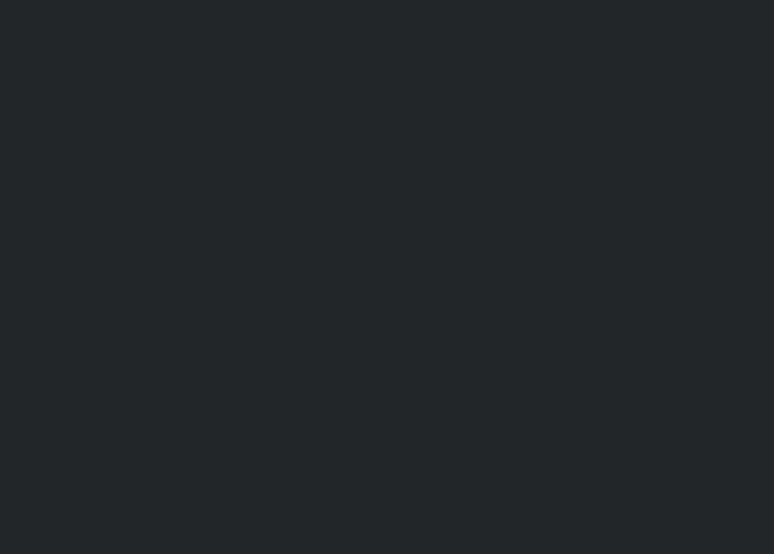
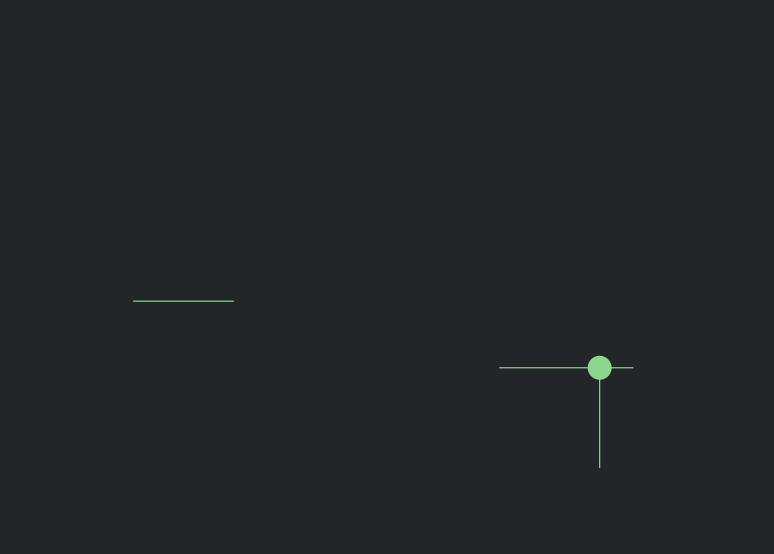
wire: none -> (133, 301) (233, 301)
wire: none -> (499, 367) (632, 367)
wire: none -> (599, 367) (599, 467)
junction: none -> (599, 367)

